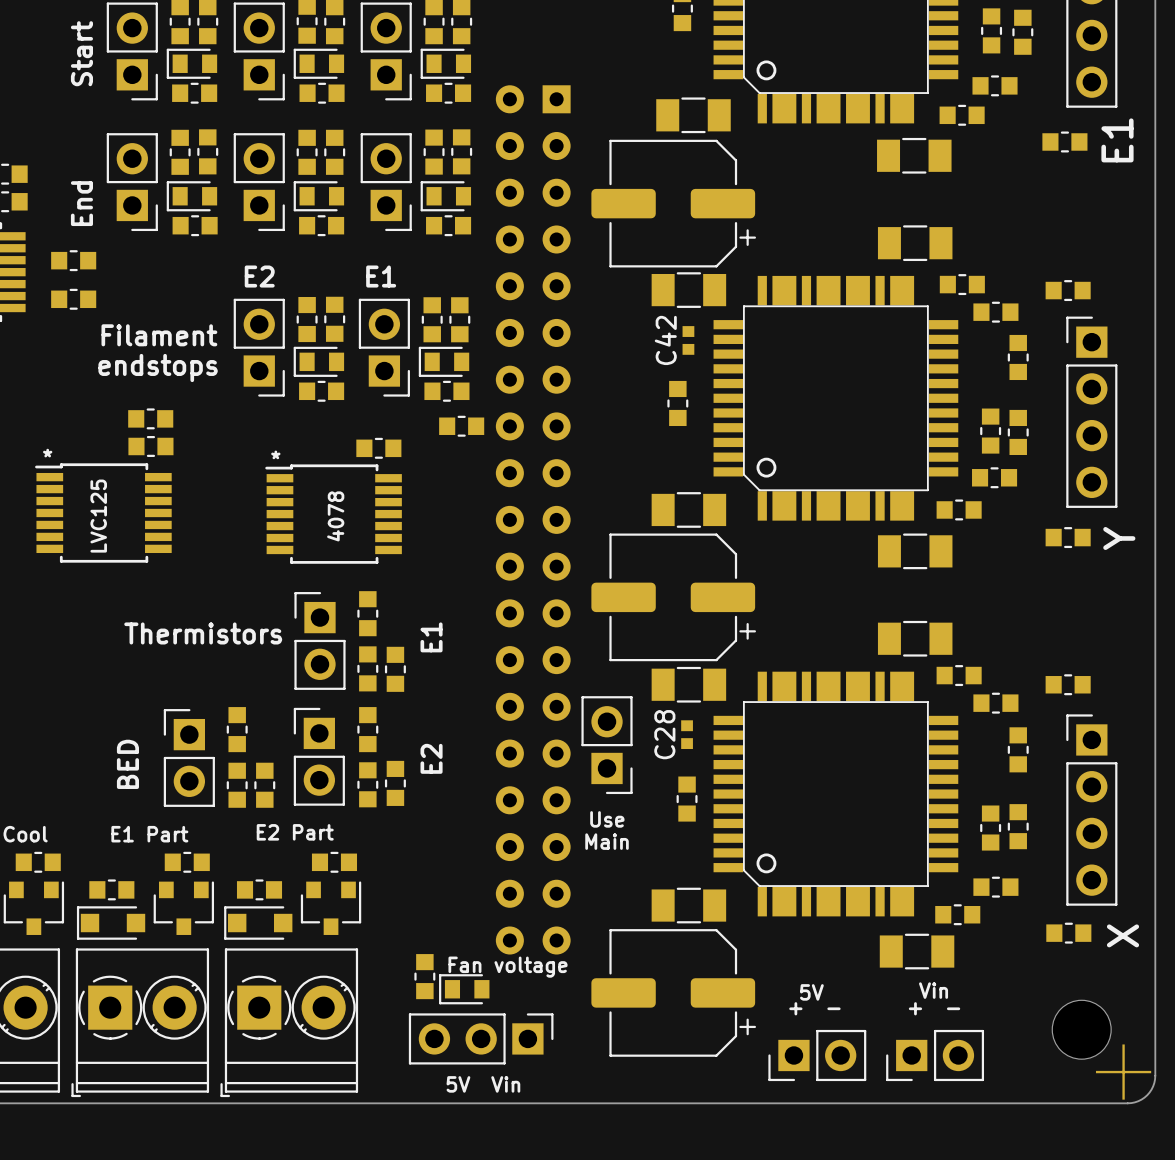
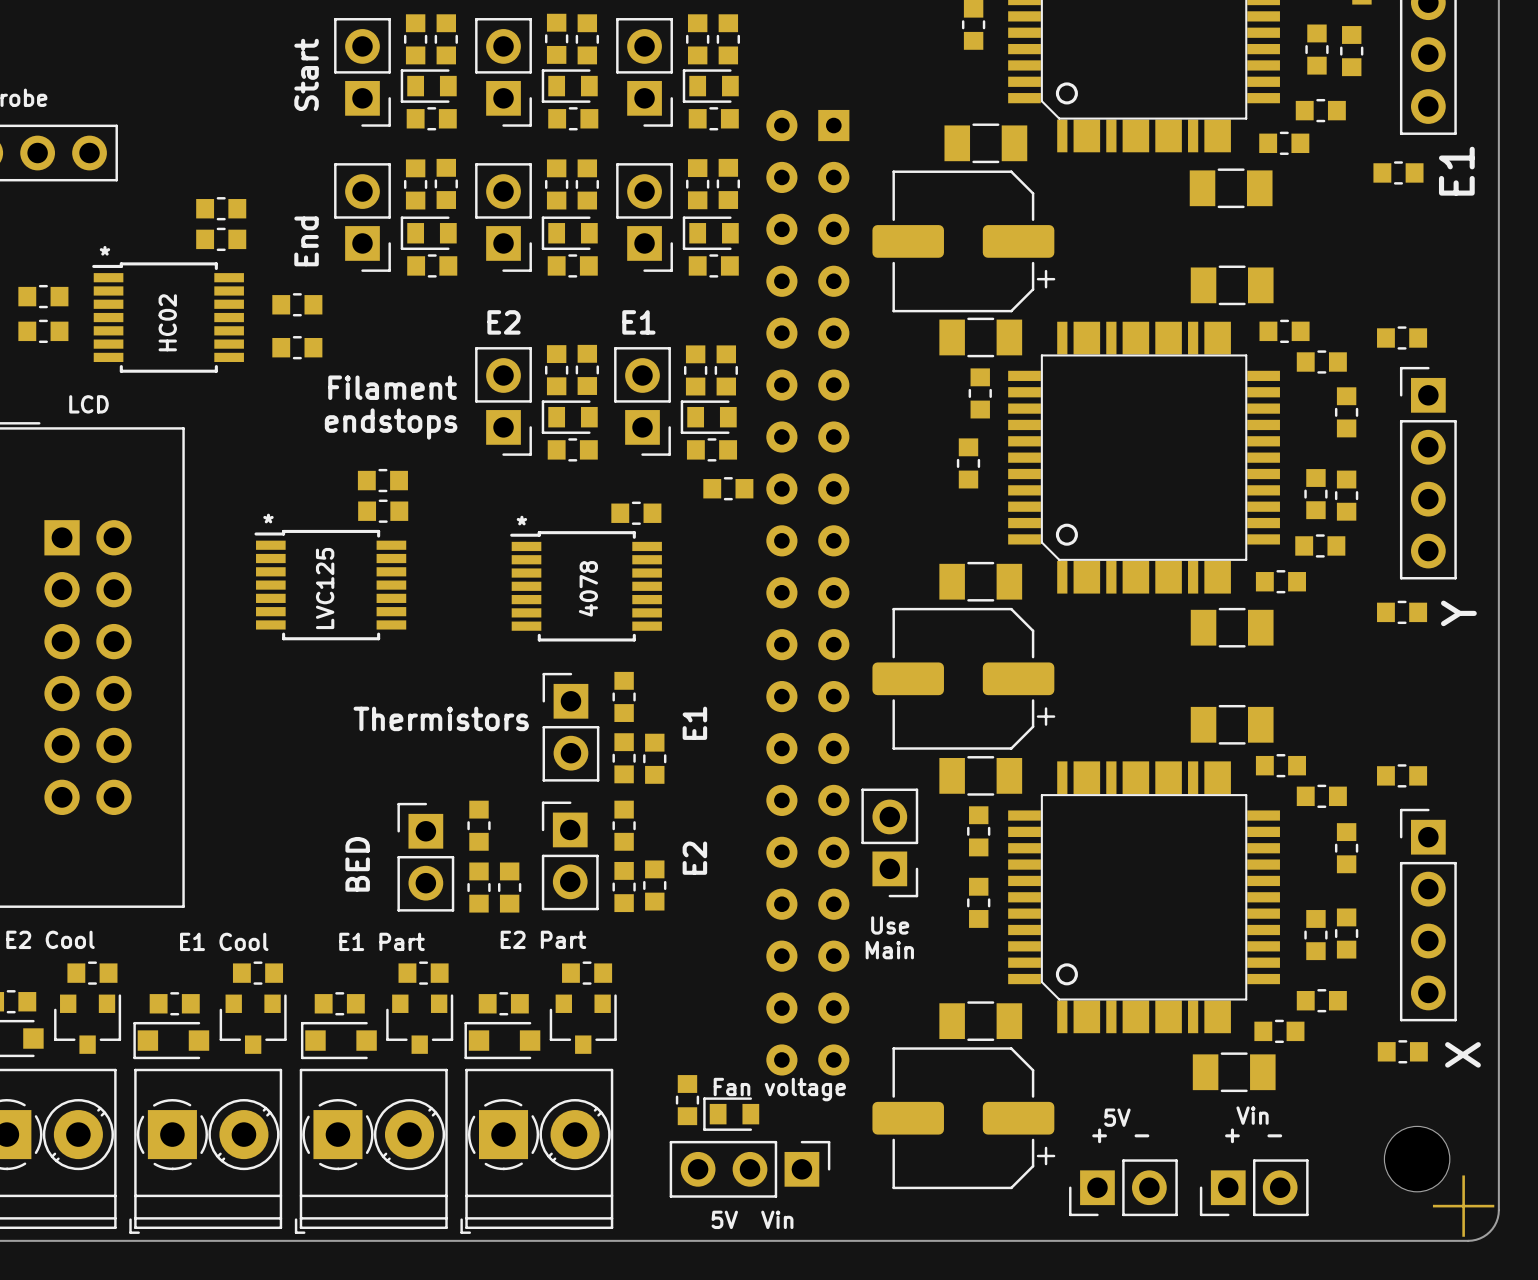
C42: (688, 340) -> none
part: none -> (980, 393)
C28: (687, 734) -> none
part: none -> (978, 831)

